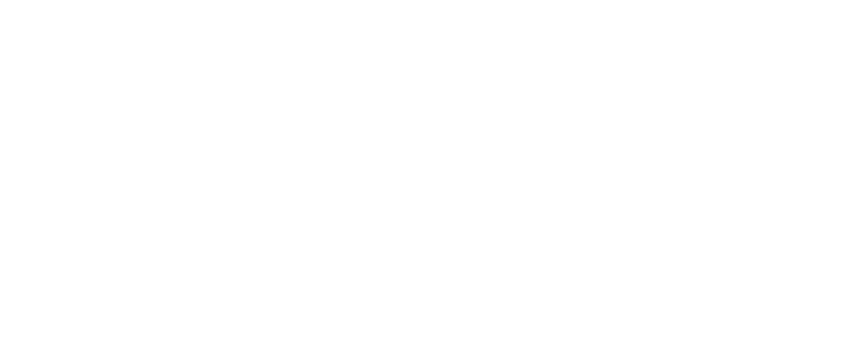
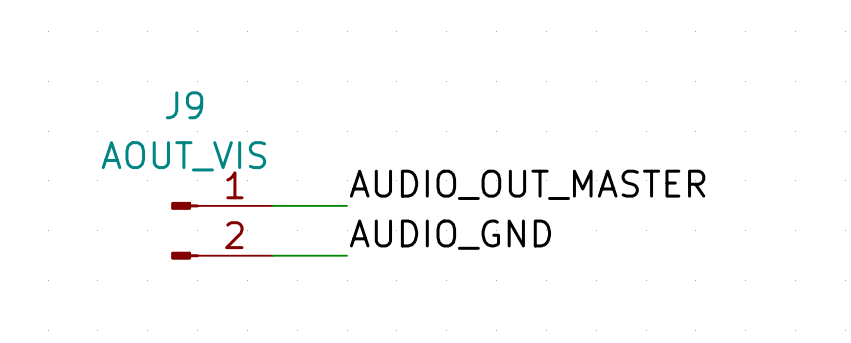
label: none -> AUDIO_OUT_MASTER (527, 184)
wire: none -> (272, 205) (347, 205)
J9: none -> AOUT_VIS (221, 230)
label: none -> AUDIO_GND (450, 234)
wire: none -> (272, 255) (347, 255)

